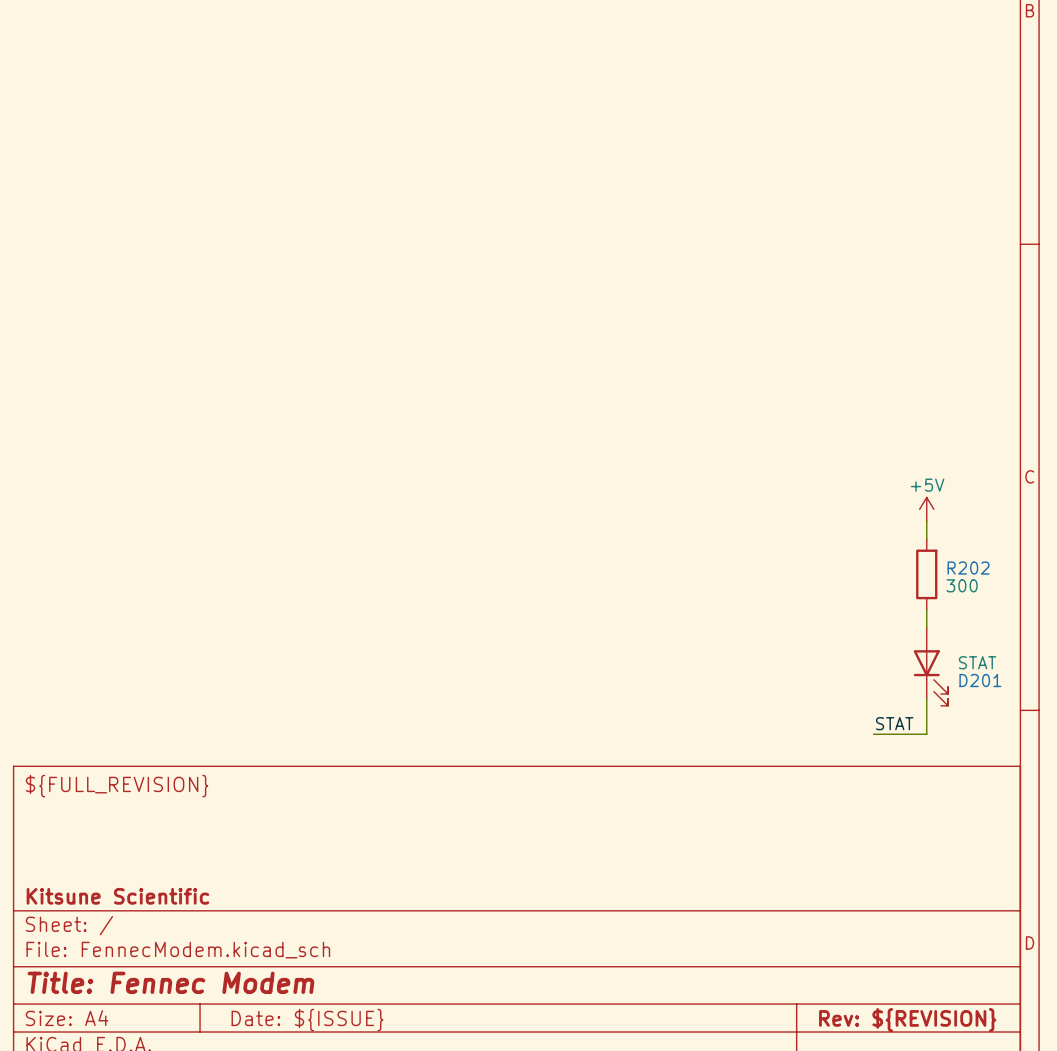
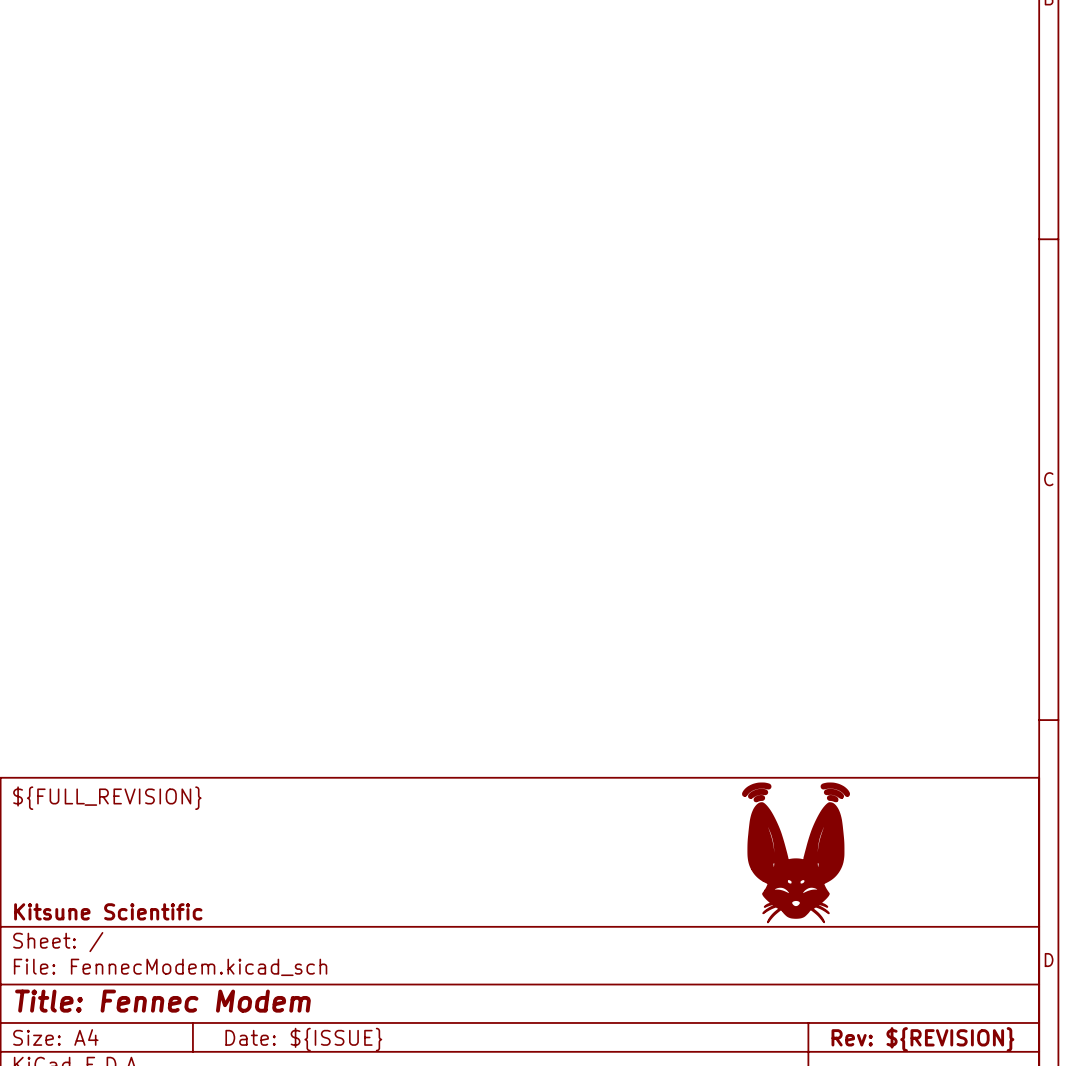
power symbol: +5V (926, 509) -> none
wire: (926, 521) (926, 538) -> none
R202: 300 (926, 574) -> none
wire: (926, 609) (926, 627) -> none
D201: STAT (930, 666) -> none
wire: (926, 698) (926, 734) (873, 734) -> none
label: STAT (894, 723) -> none
power symbol: none -> (796, 852)

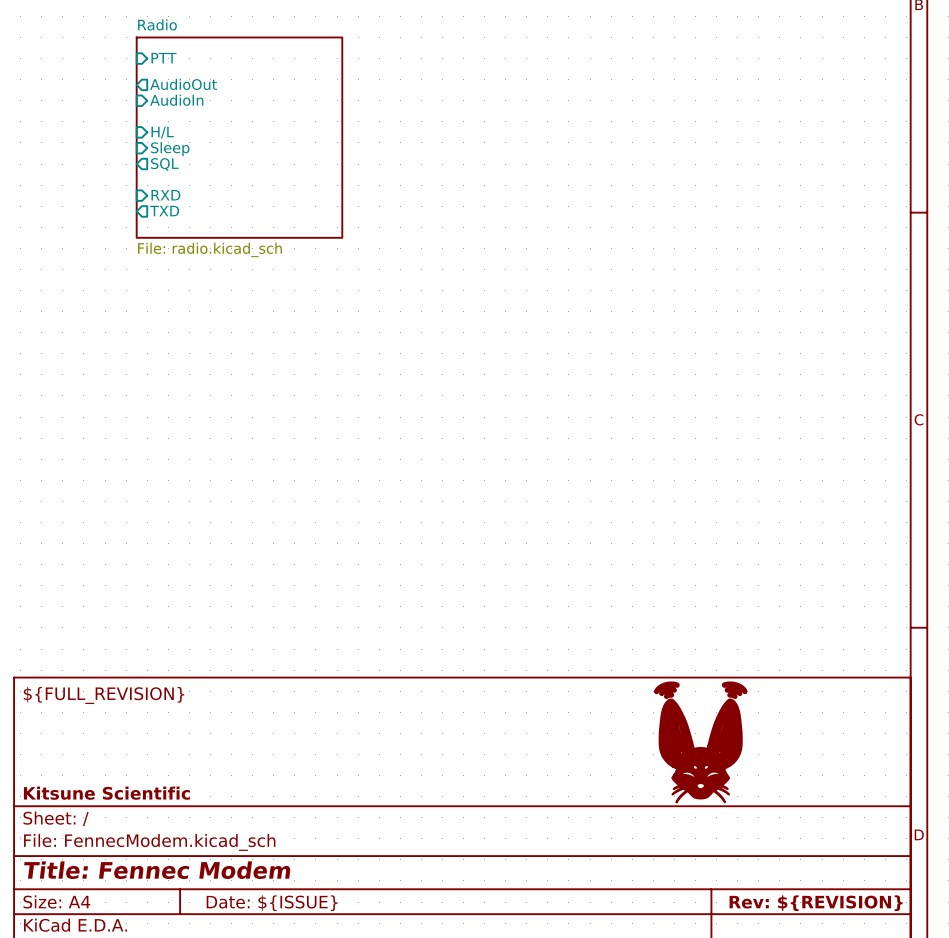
sheet pin: none -> PTT (163, 58)
sheet pin: none -> AudioOut (183, 84)
sheet pin: none -> AudioIn (176, 100)
sheet pin: none -> H/L (162, 132)
sheet Radio: none -> File: radio.kicad_sch (239, 137)
sheet pin: none -> Sleep (170, 149)
sheet pin: none -> SQL (164, 164)
sheet pin: none -> RXD (165, 195)
sheet pin: none -> TXD (164, 211)

